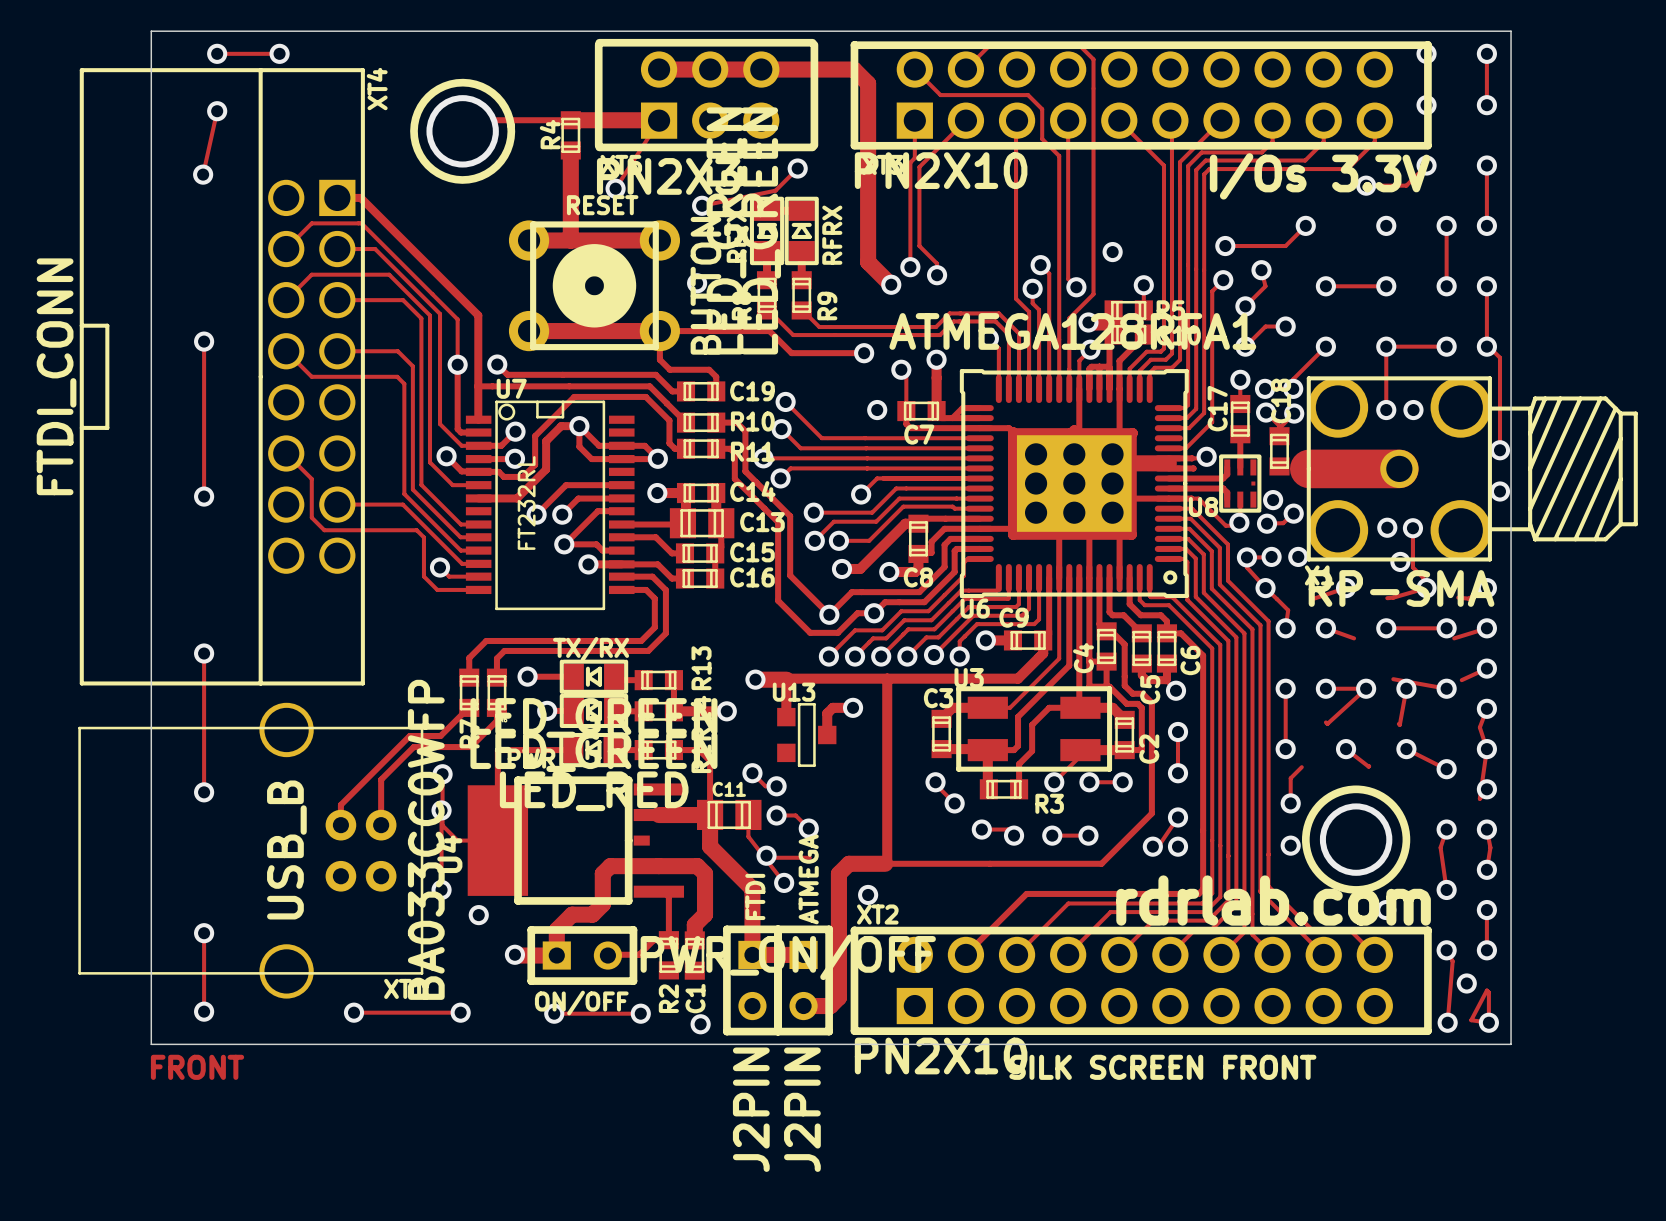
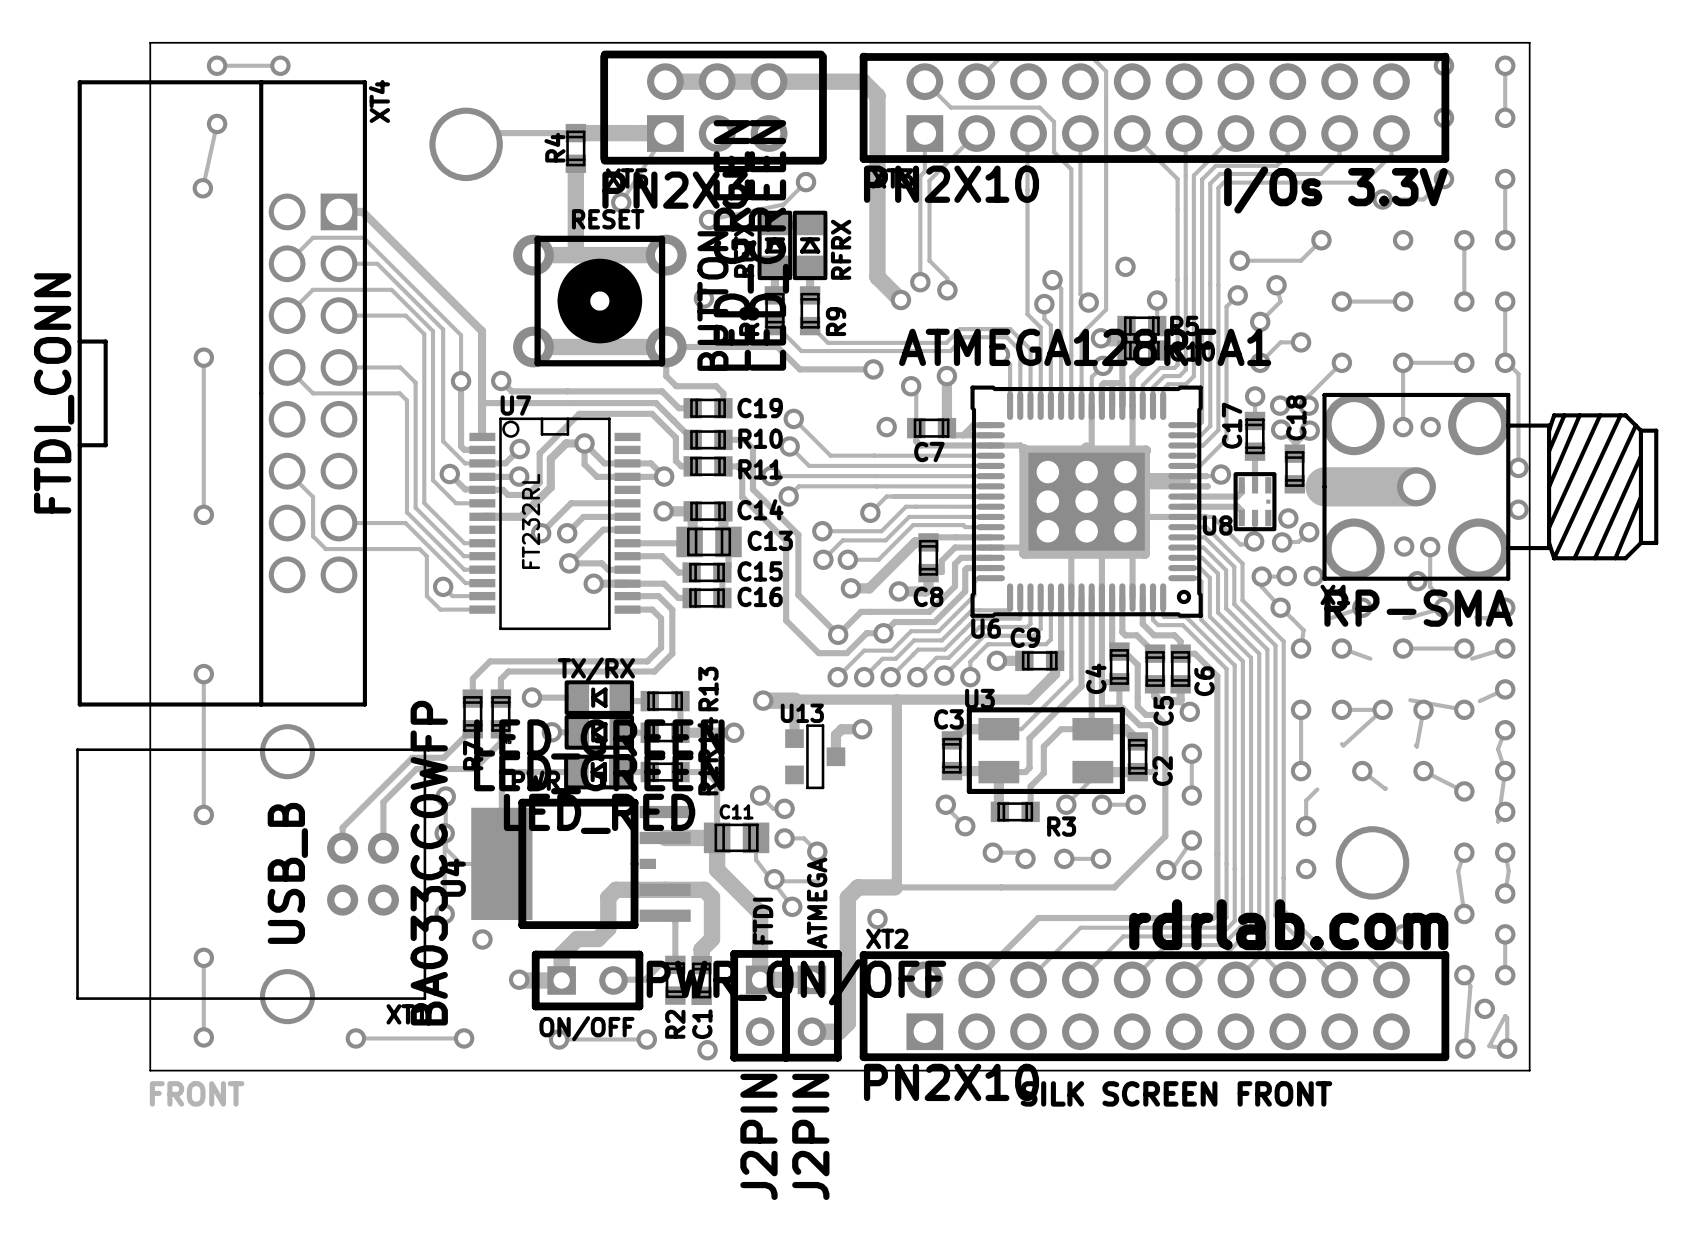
line: (510, 125) (509, 144) (501, 161) (486, 173) (468, 179) (449, 178) (432, 169) (420, 155) (414, 137) (415, 118) (424, 101) (438, 89) (456, 83) (475, 84) (492, 92) (504, 107) (510, 125) -> none
drawing: [1301, 785, 1411, 894] -> none

